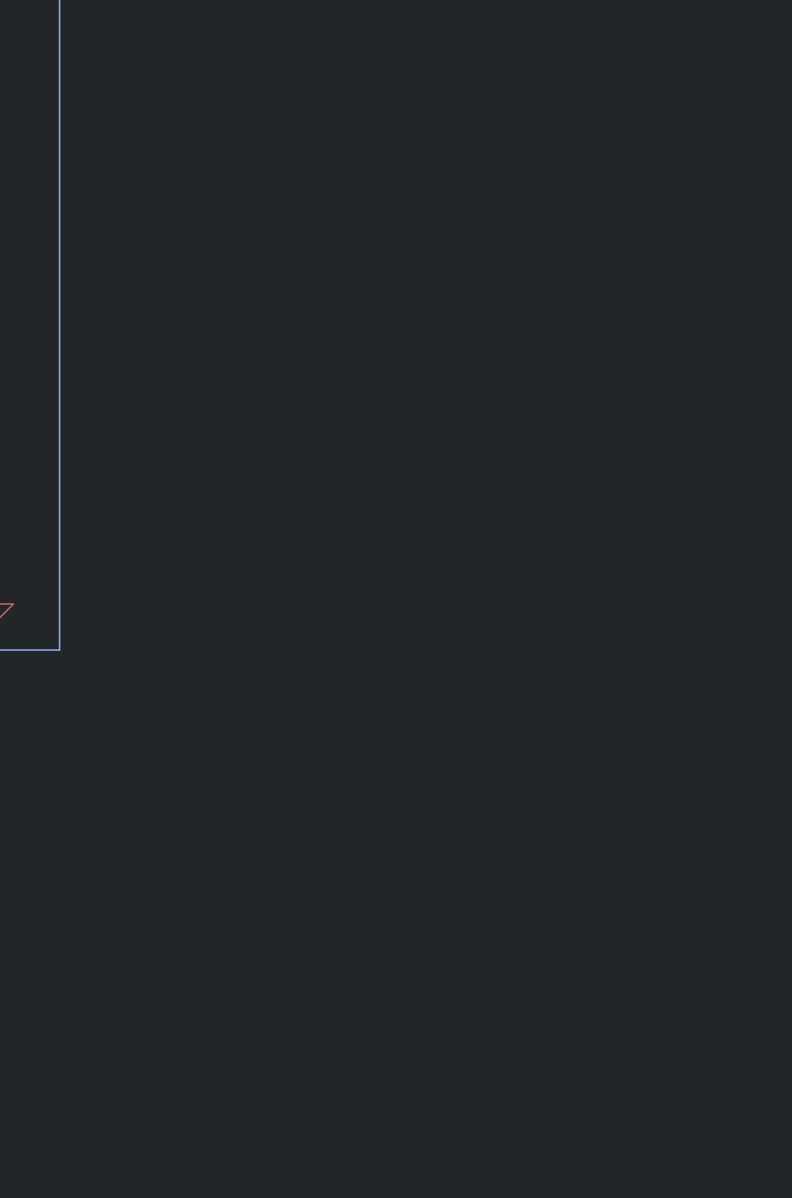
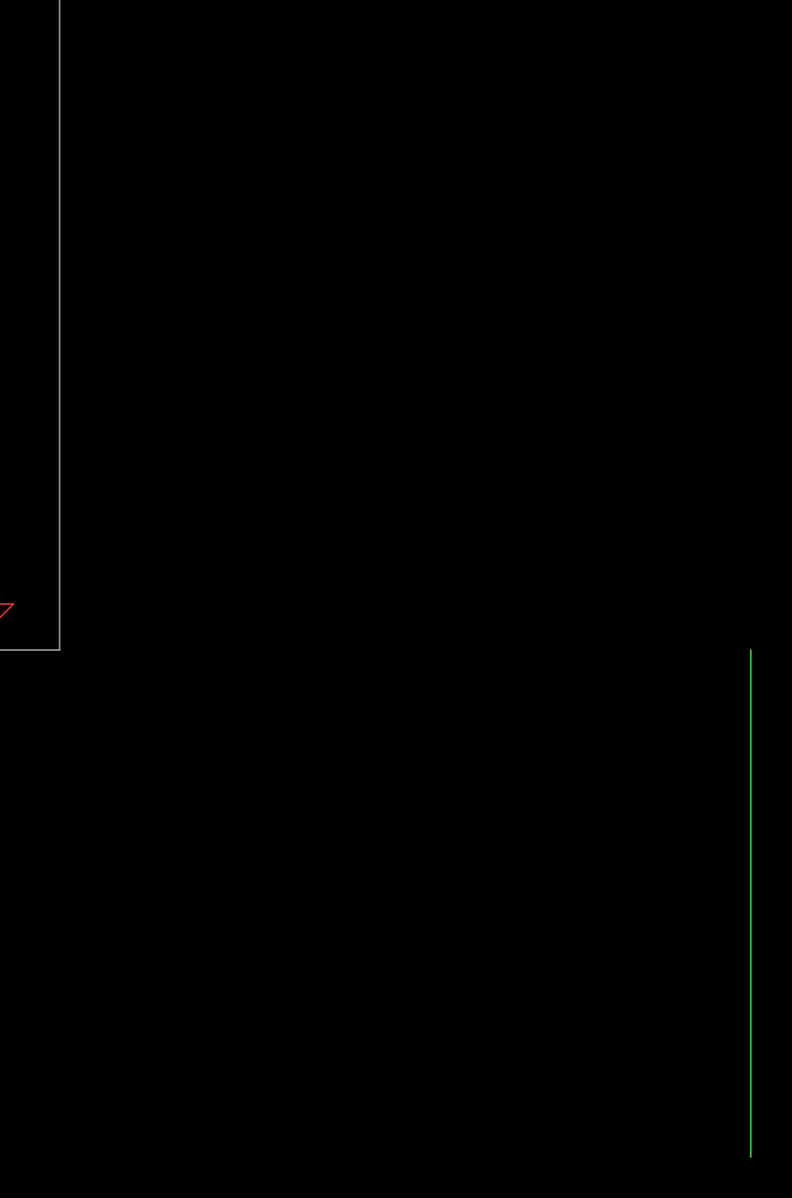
wire: none -> (750, 650) (750, 1156)

